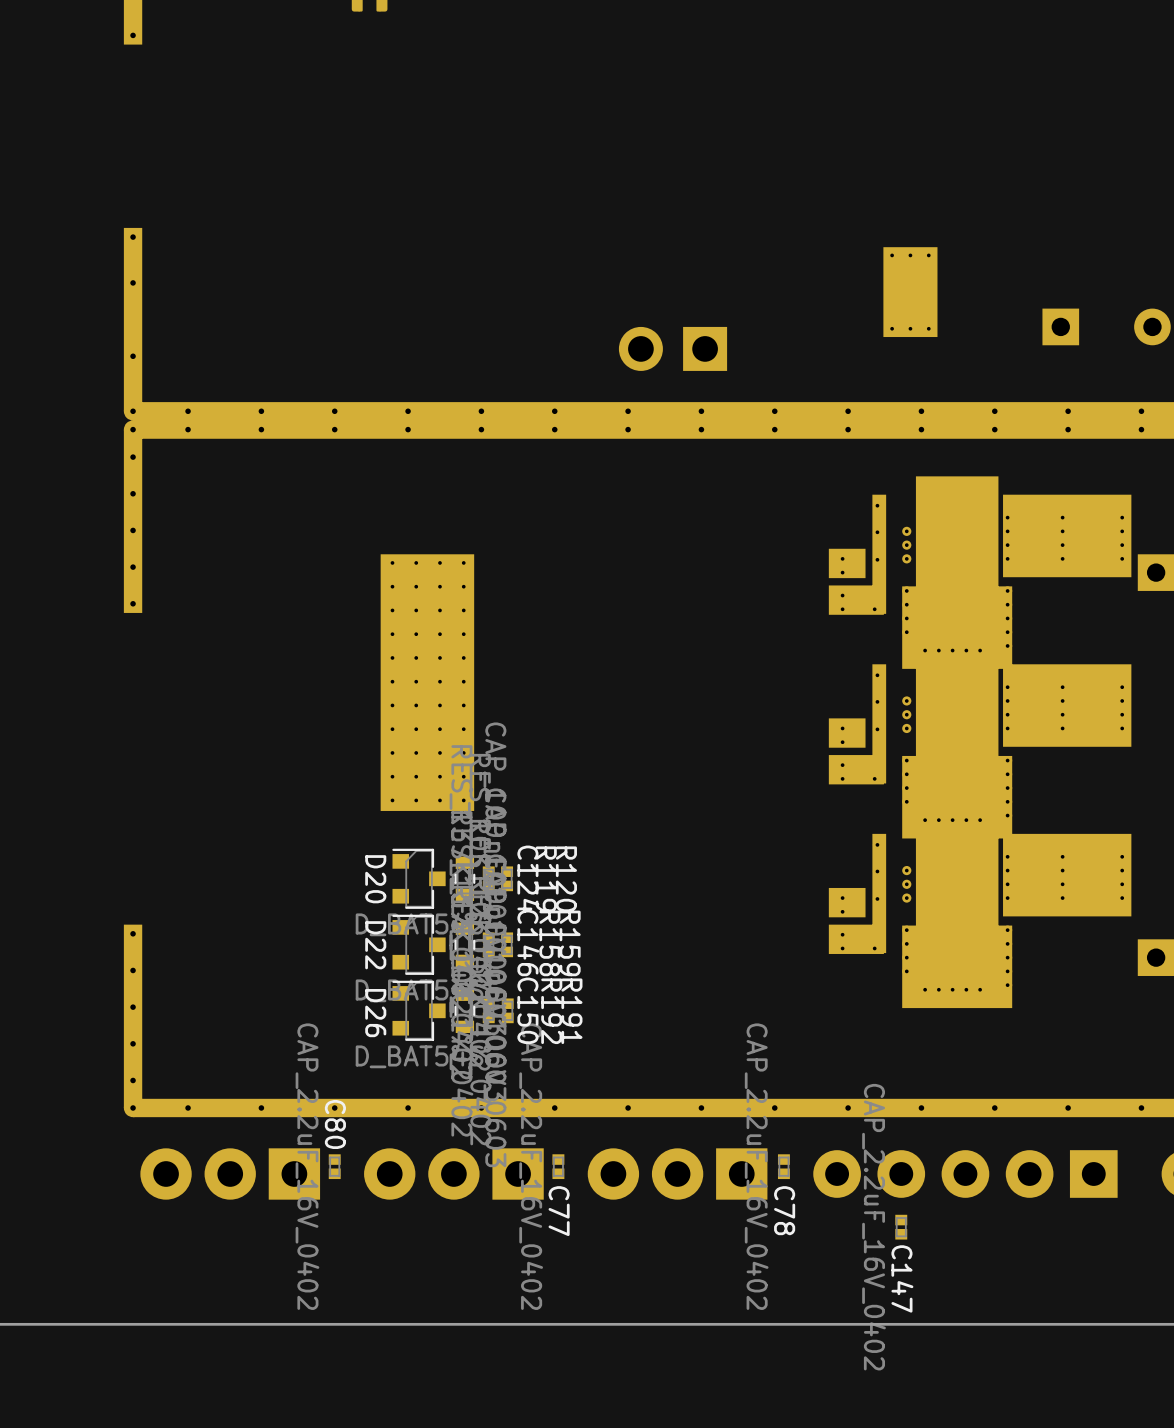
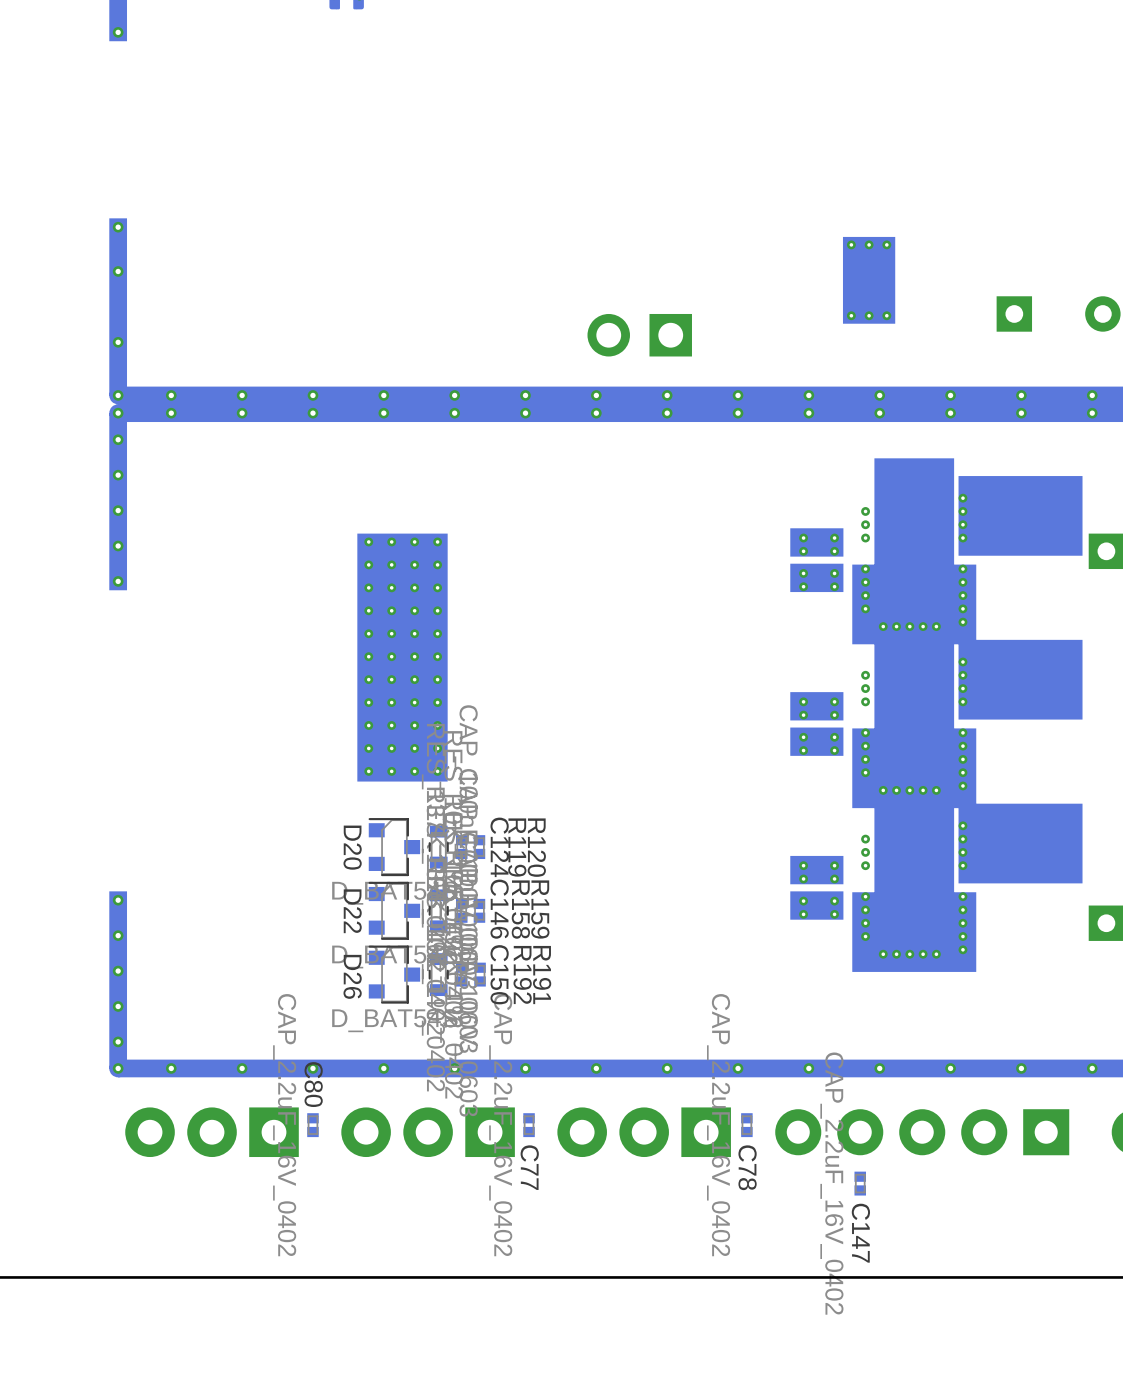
part footprint: [828, 476, 1132, 669] -> [790, 458, 1083, 645]
part footprint: [828, 645, 1132, 839] -> [790, 622, 1083, 809]
part footprint: [828, 815, 1132, 1009] -> [790, 785, 1083, 972]

